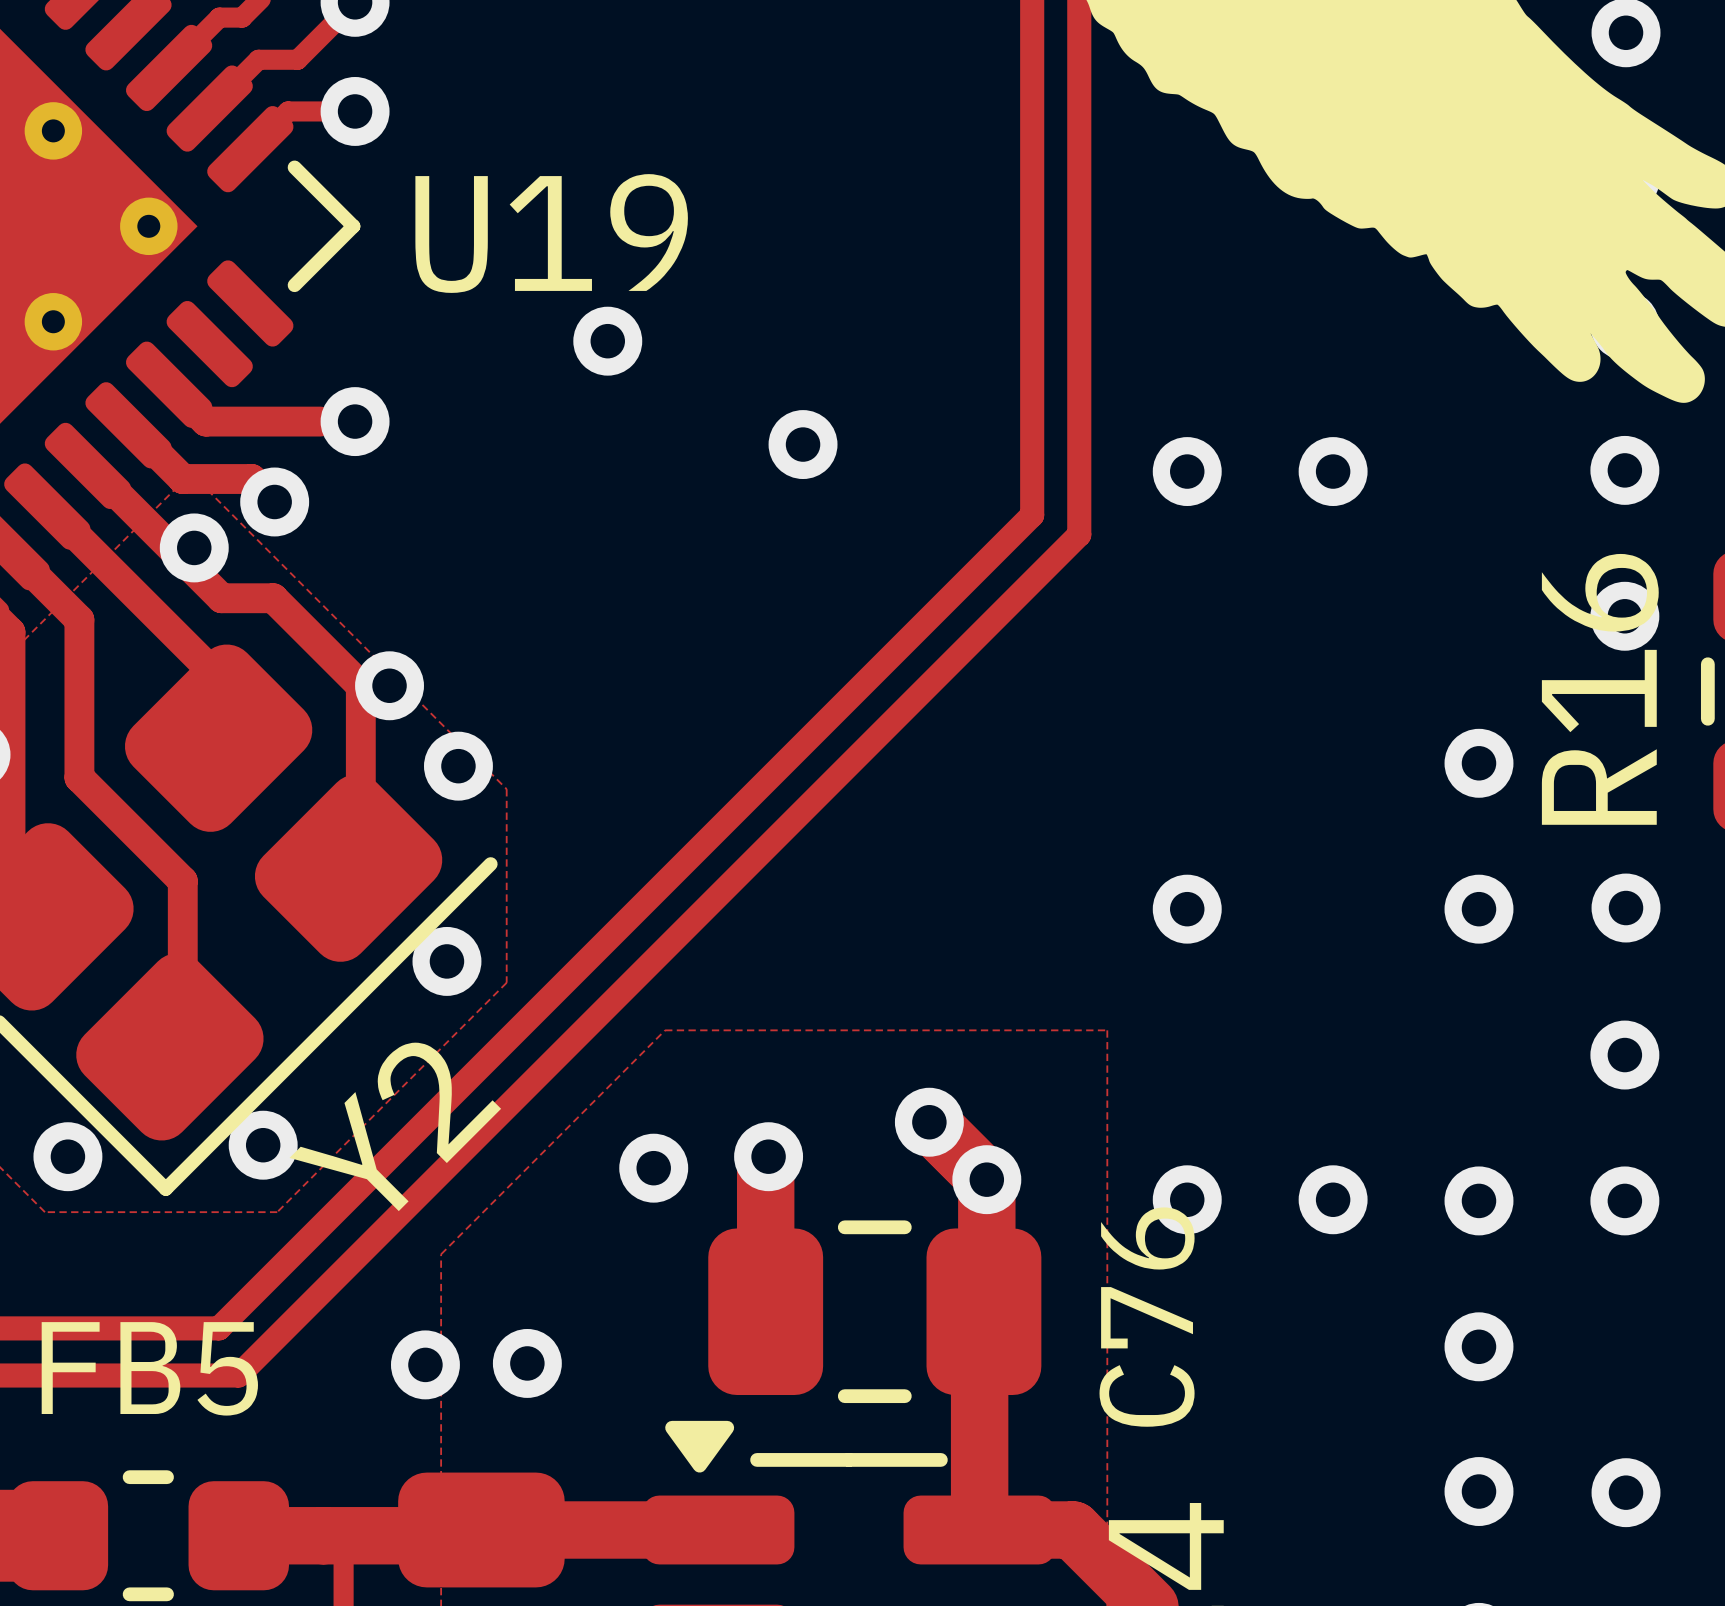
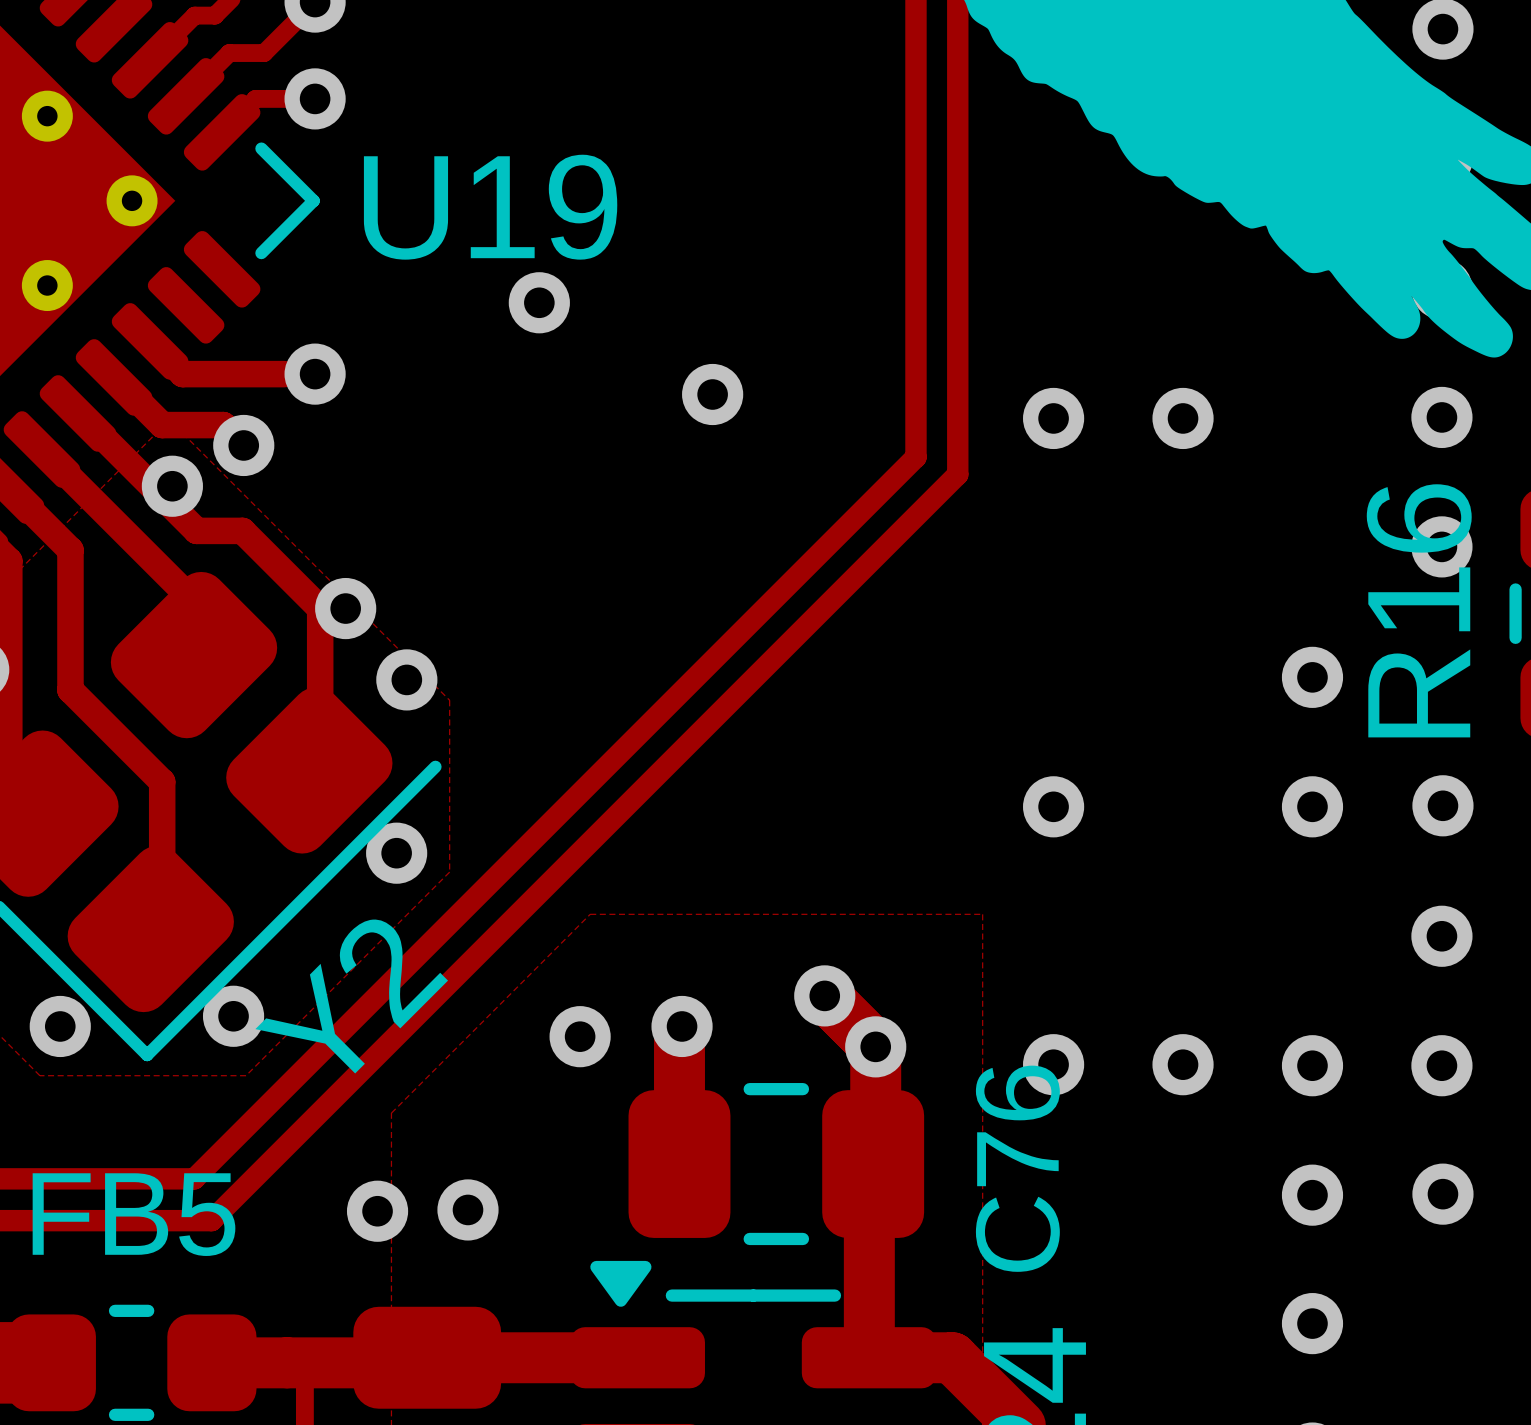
via position: (1626, 1492) -> (1442, 1194)

